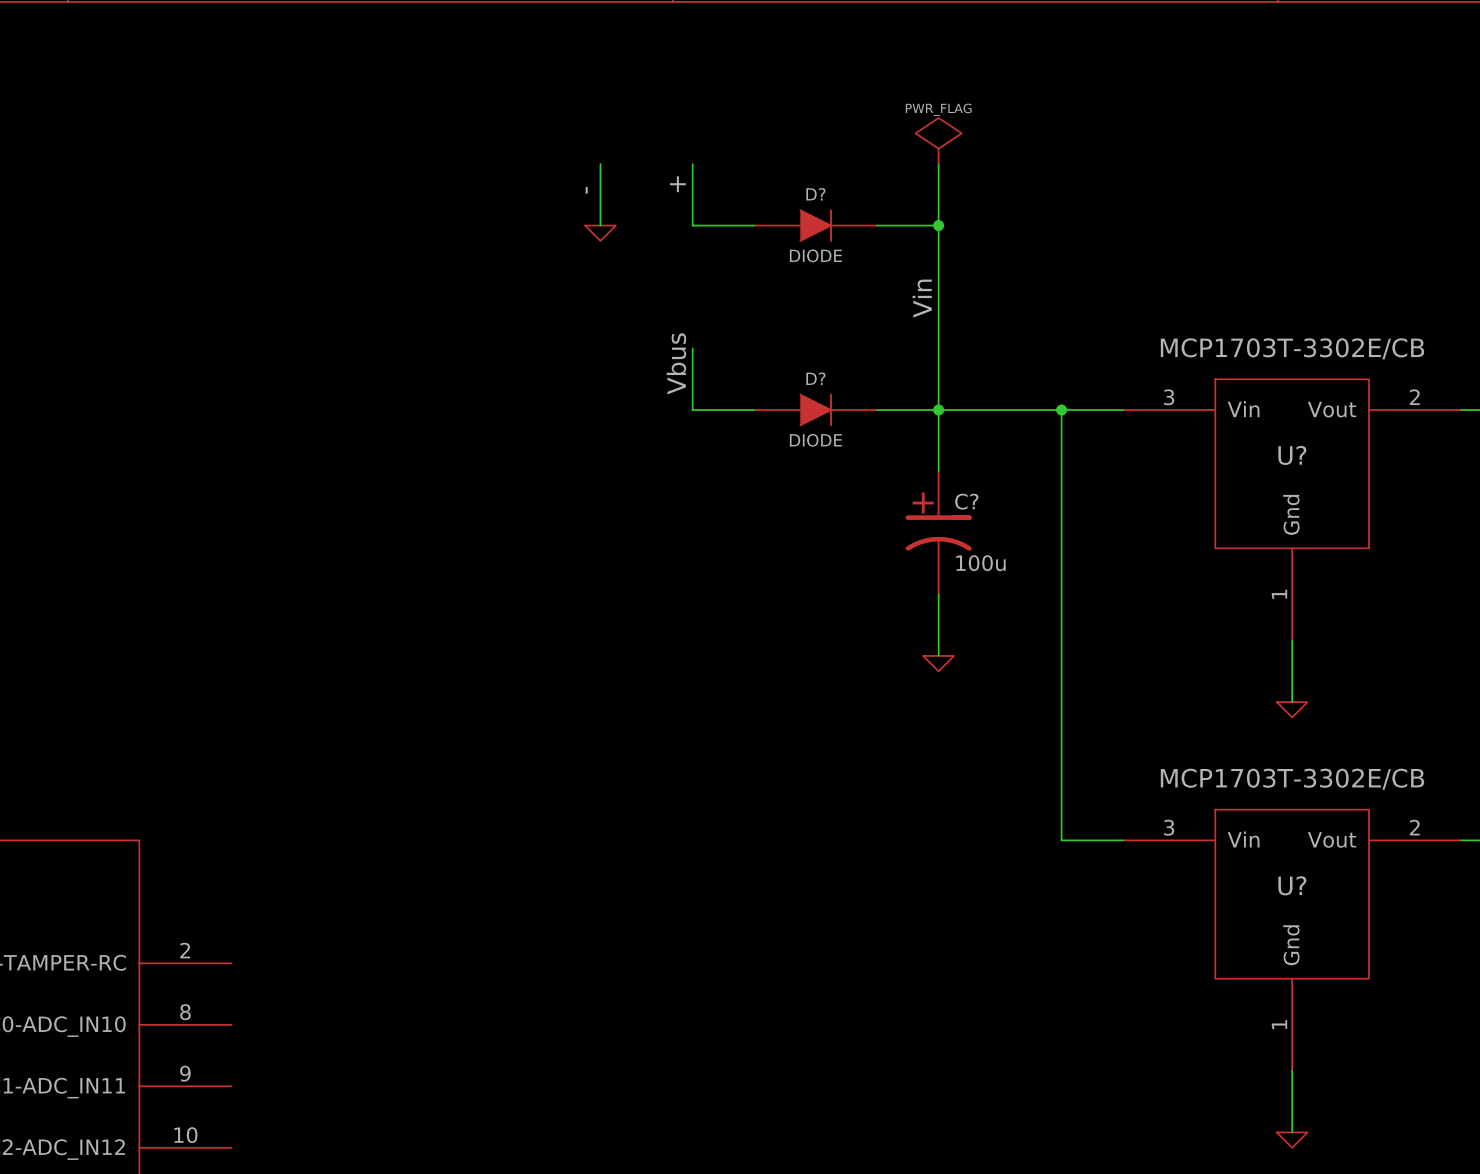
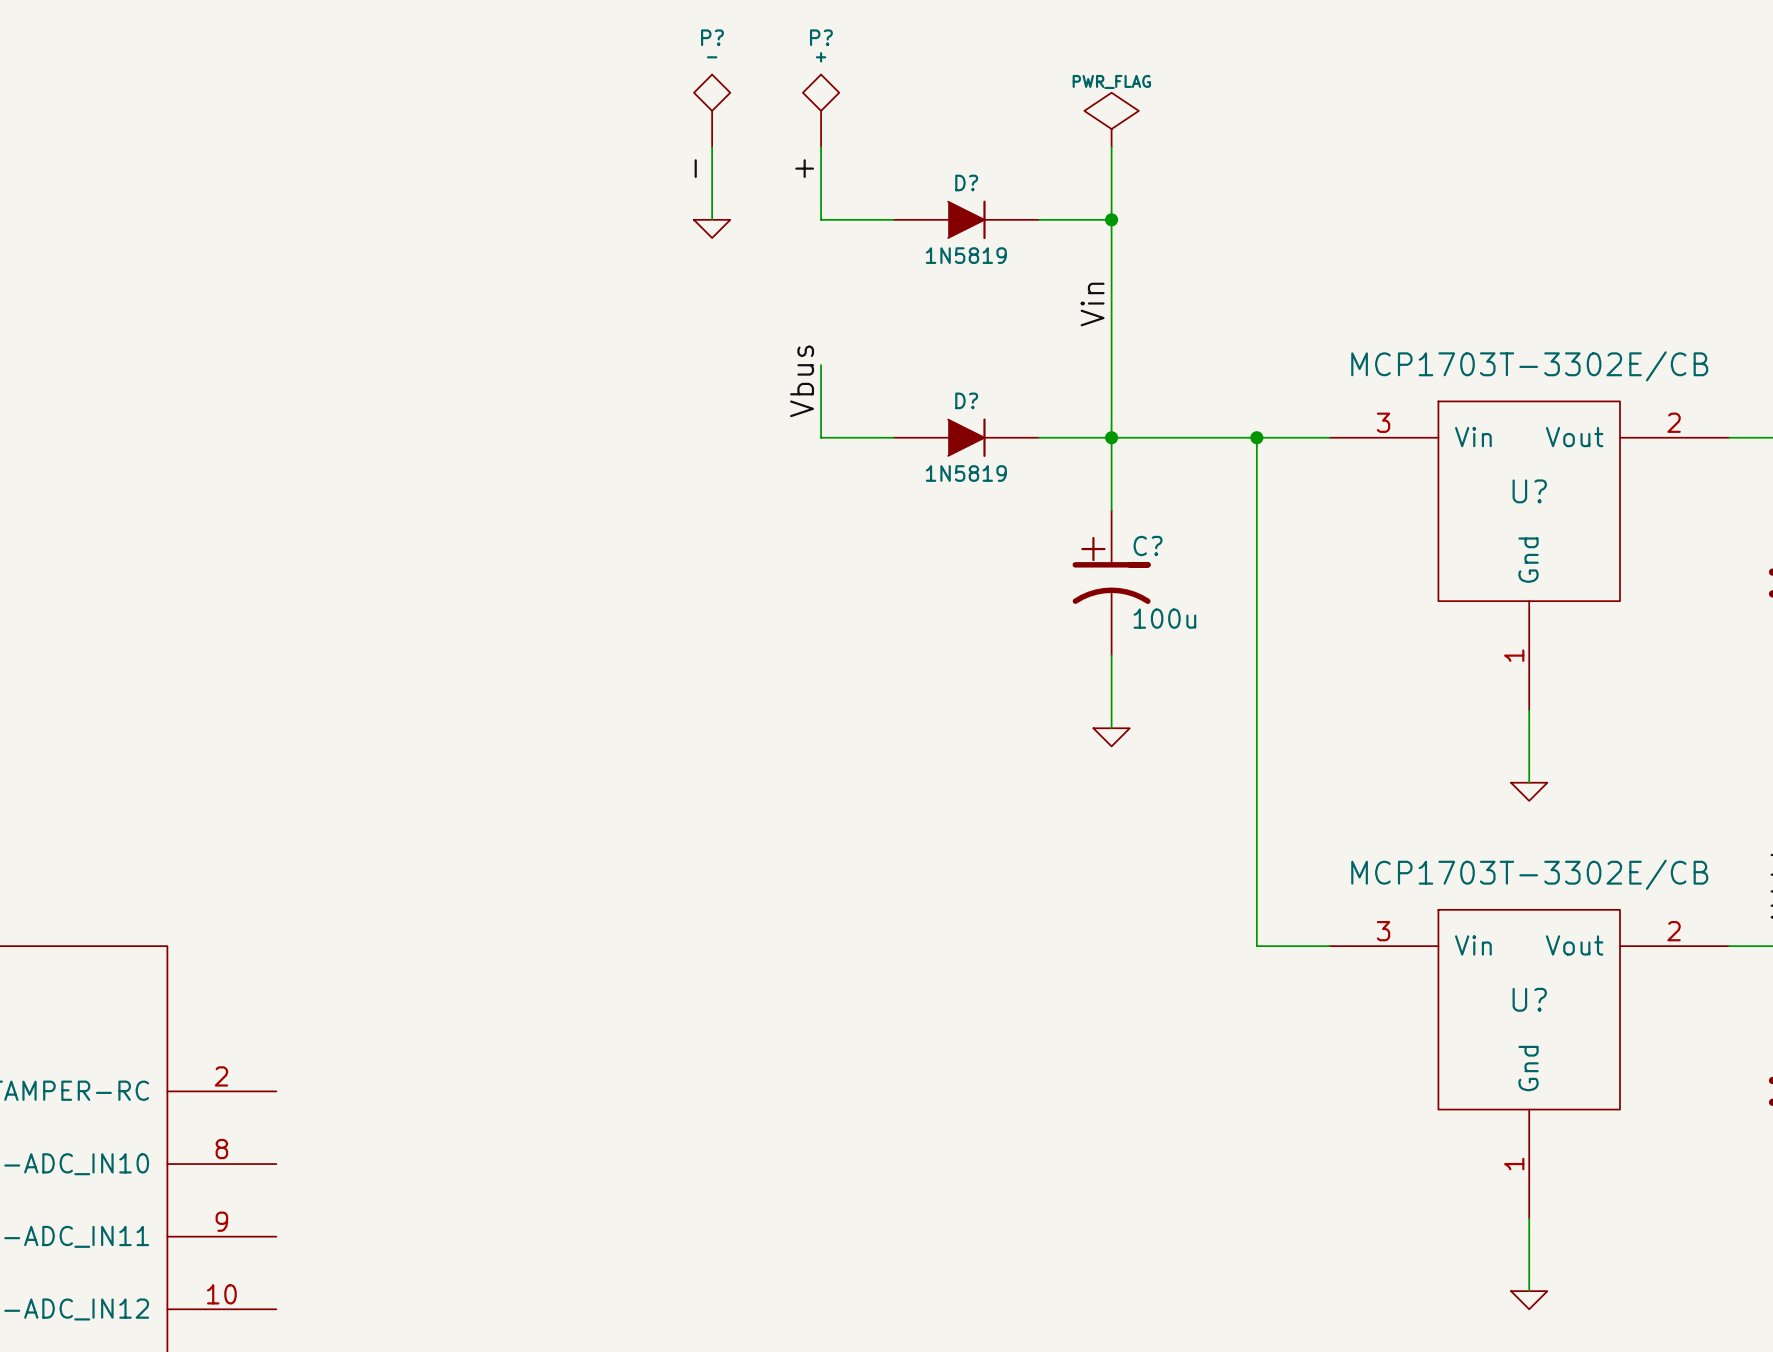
P?: none -> - (712, 110)
P?: none -> + (821, 110)
D? value: DIODE (815, 255) -> 1N5819 (966, 255)
D? value: DIODE (815, 440) -> 1N5819 (966, 473)

